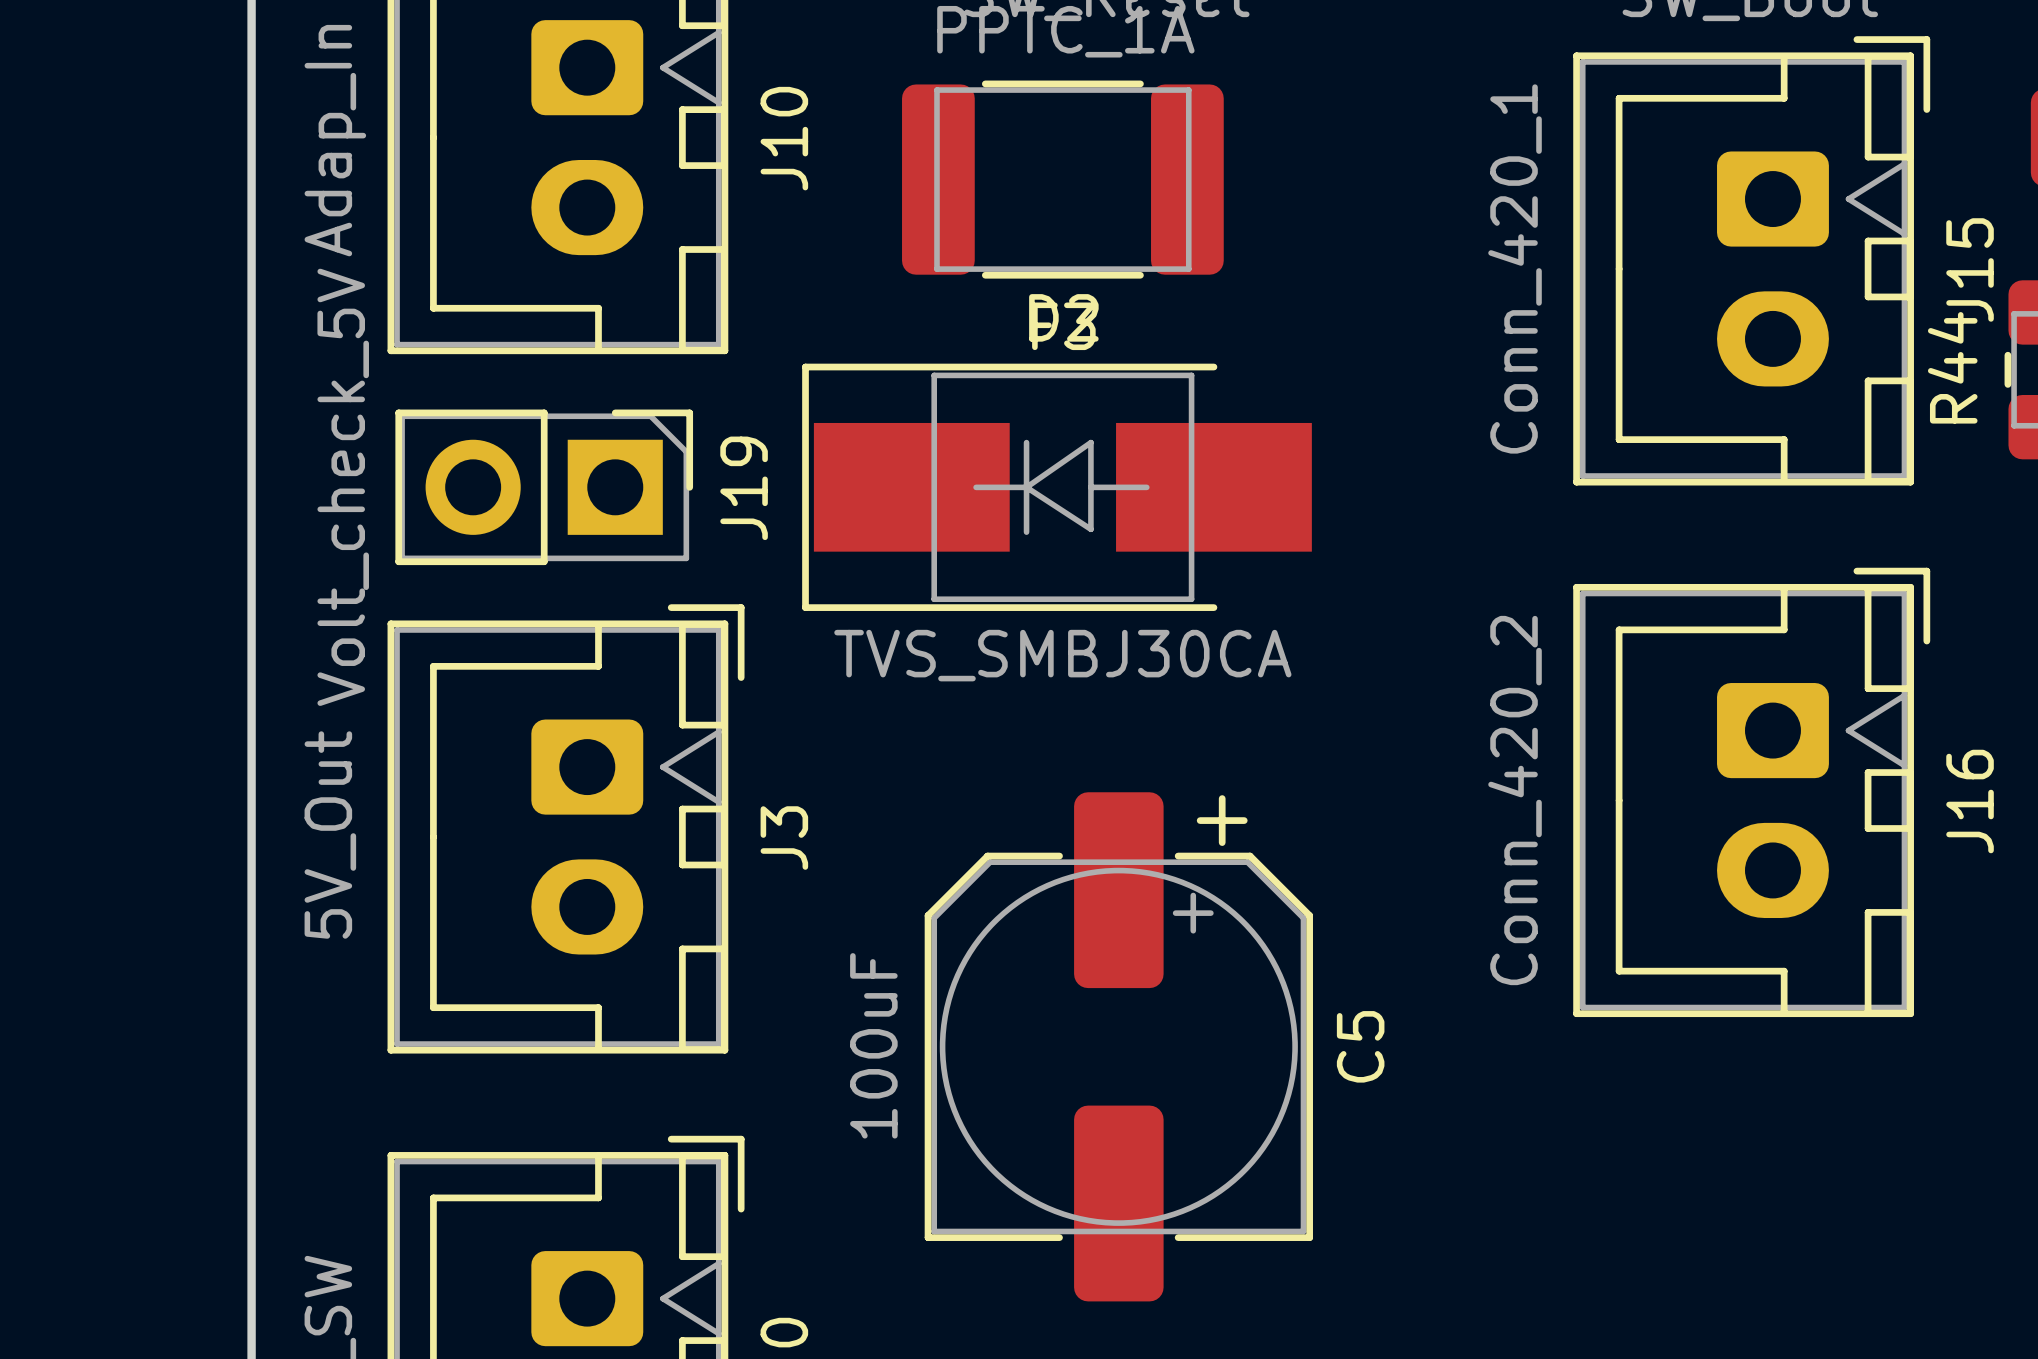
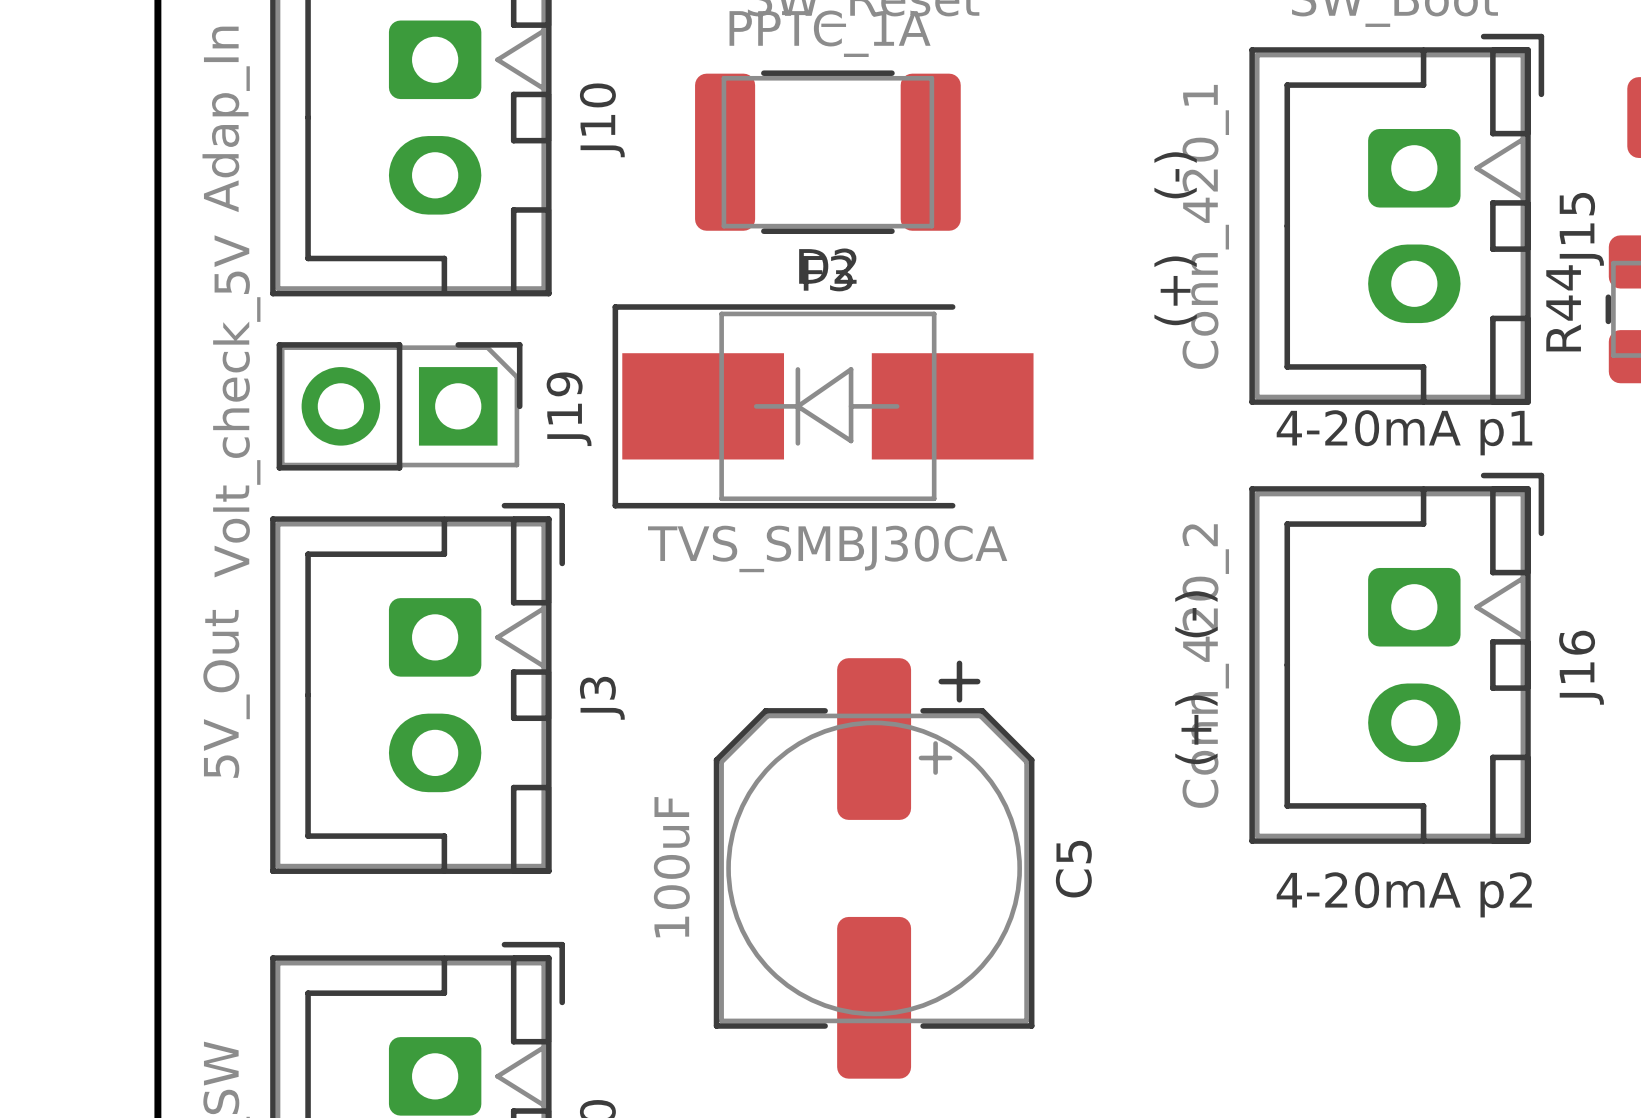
text: none -> (-) (1175, 175)
text: none -> (+) (1175, 290)
text: none -> 4-20mA p1 (1404, 432)
text: none -> (-) (1196, 614)
text: none -> (+) (1196, 729)
text: none -> 4-20mA p2 (1404, 894)

